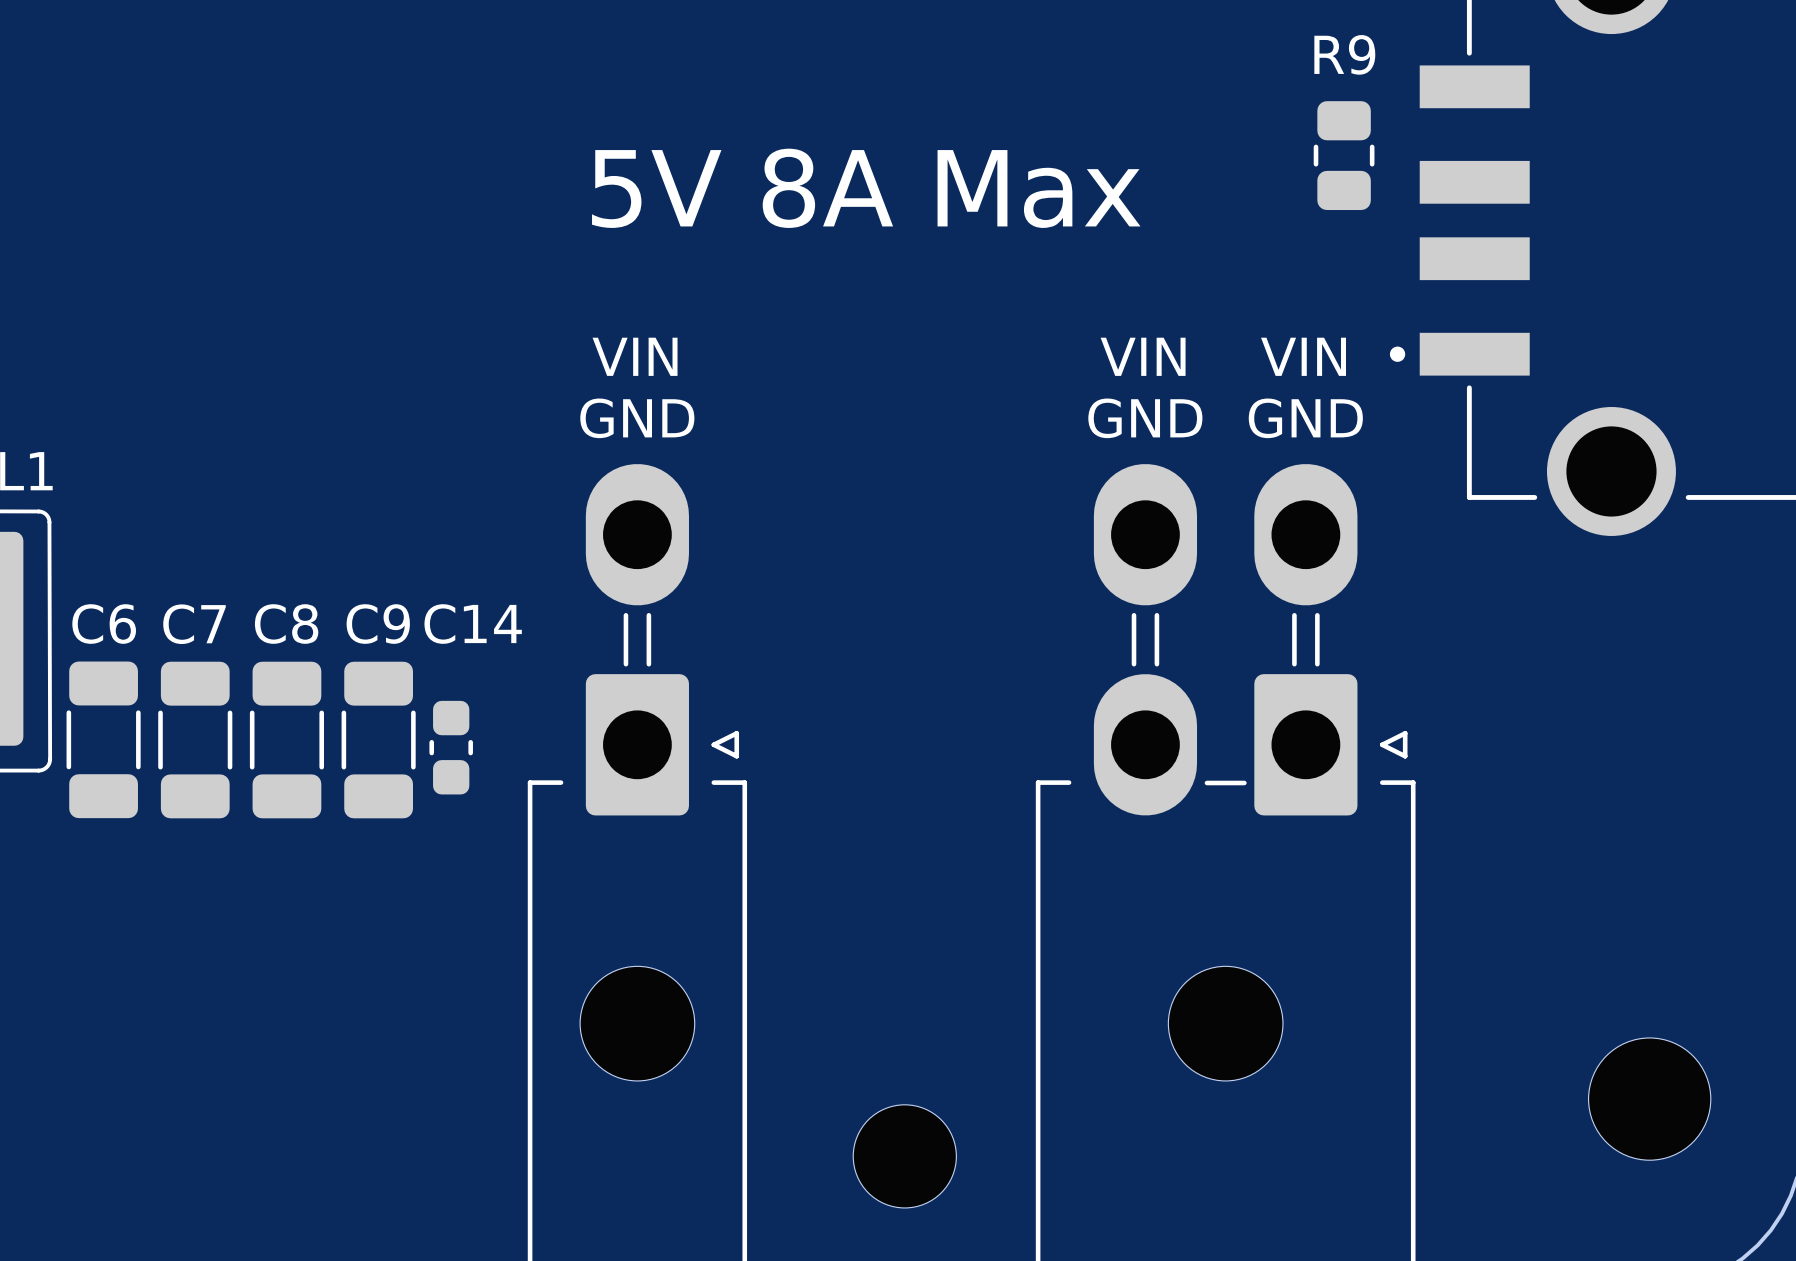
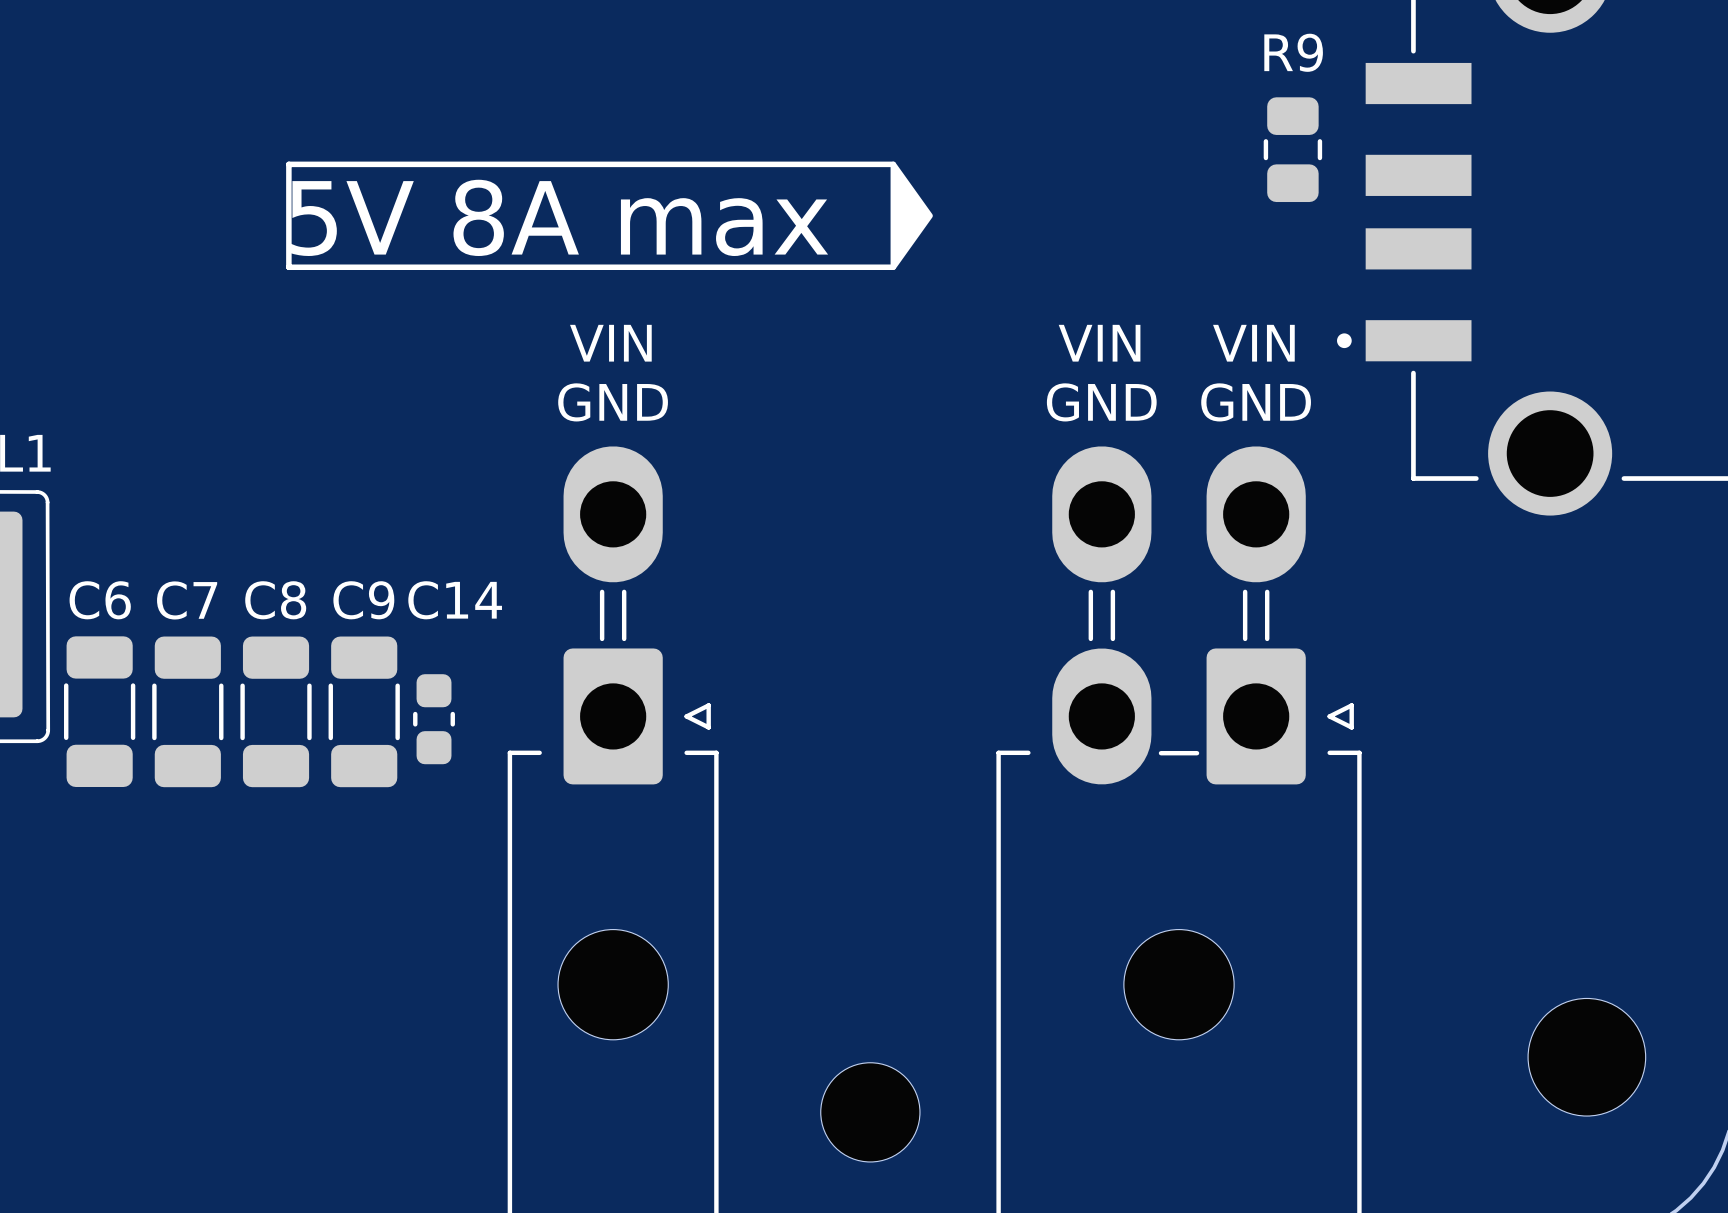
drawing: none -> [890, 161, 933, 271]
line: none -> (893, 164) (288, 164) (288, 267) (893, 267)
text: 5V 8A Max (866, 188) -> 5V 8A max (558, 217)

